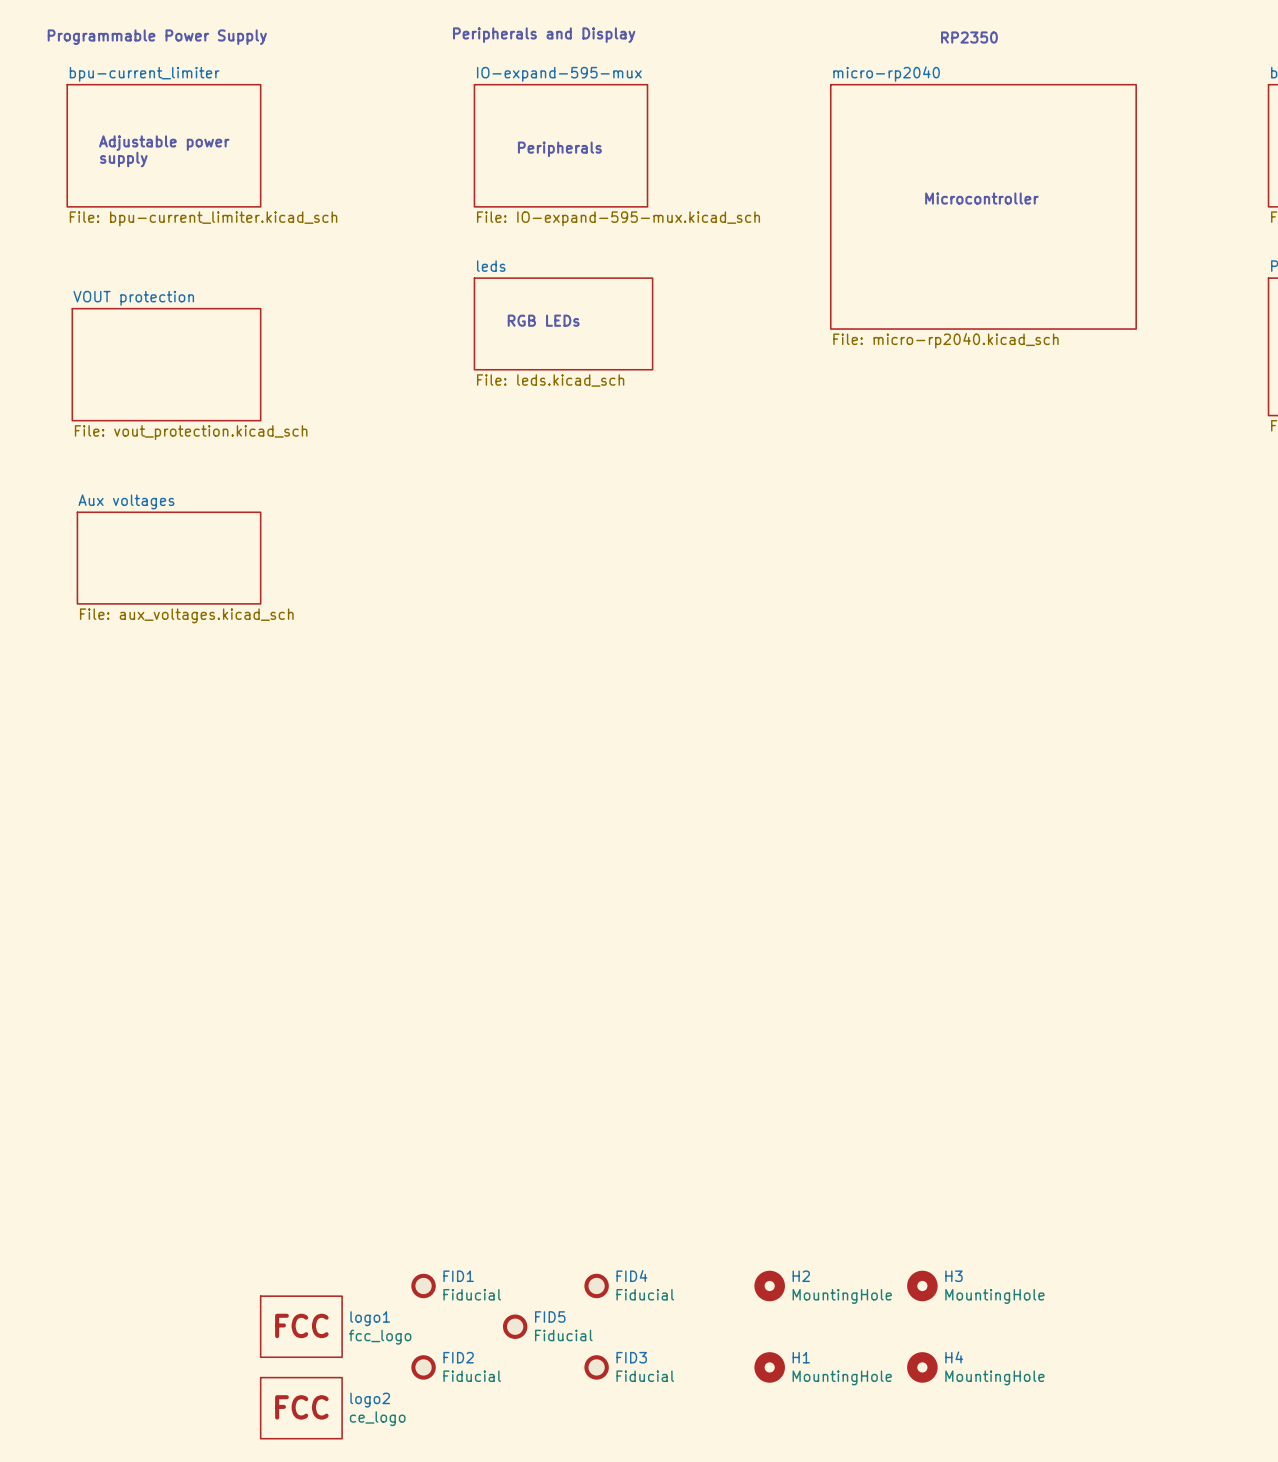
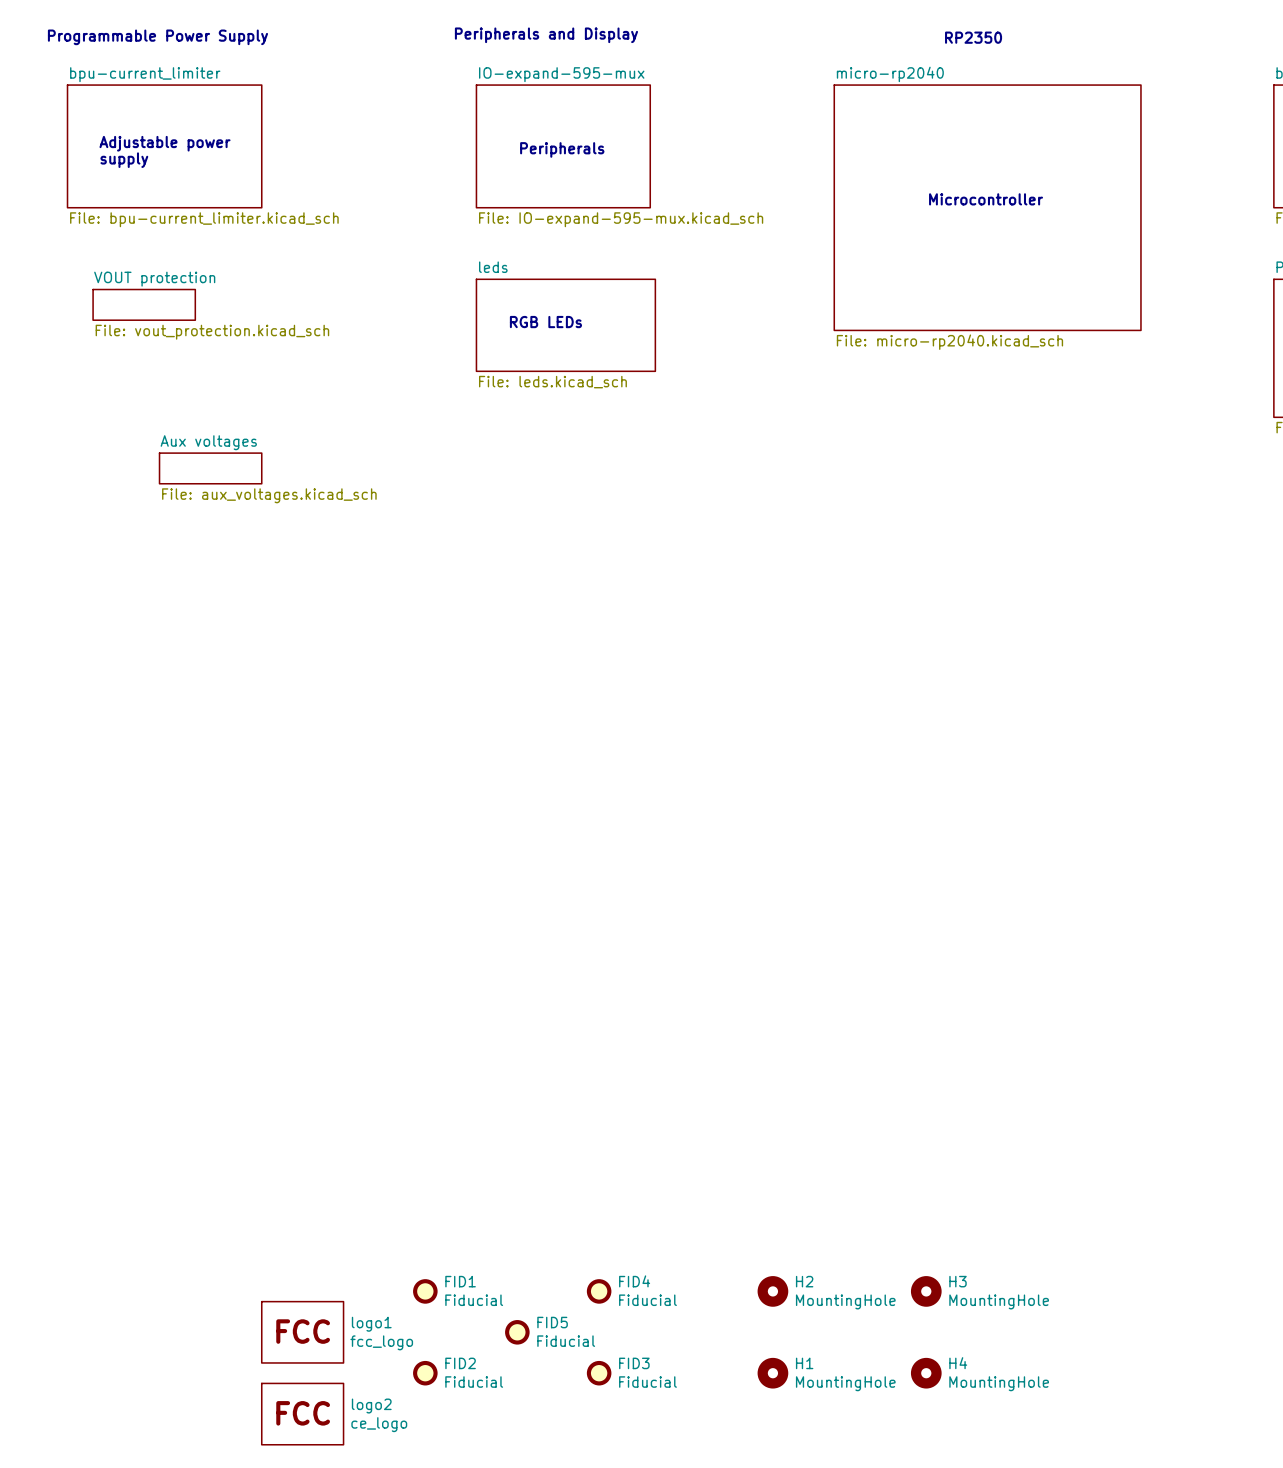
sheet VOUT protection: none -> File: vout_protection.kicad_sch (144, 304)
sheet VOUT protection: File: vout_protection.kicad_sch (166, 364) -> none
sheet Aux voltages: none -> File: aux_voltages.kicad_sch (210, 468)
sheet Aux voltages: File: aux_voltages.kicad_sch (169, 558) -> none

